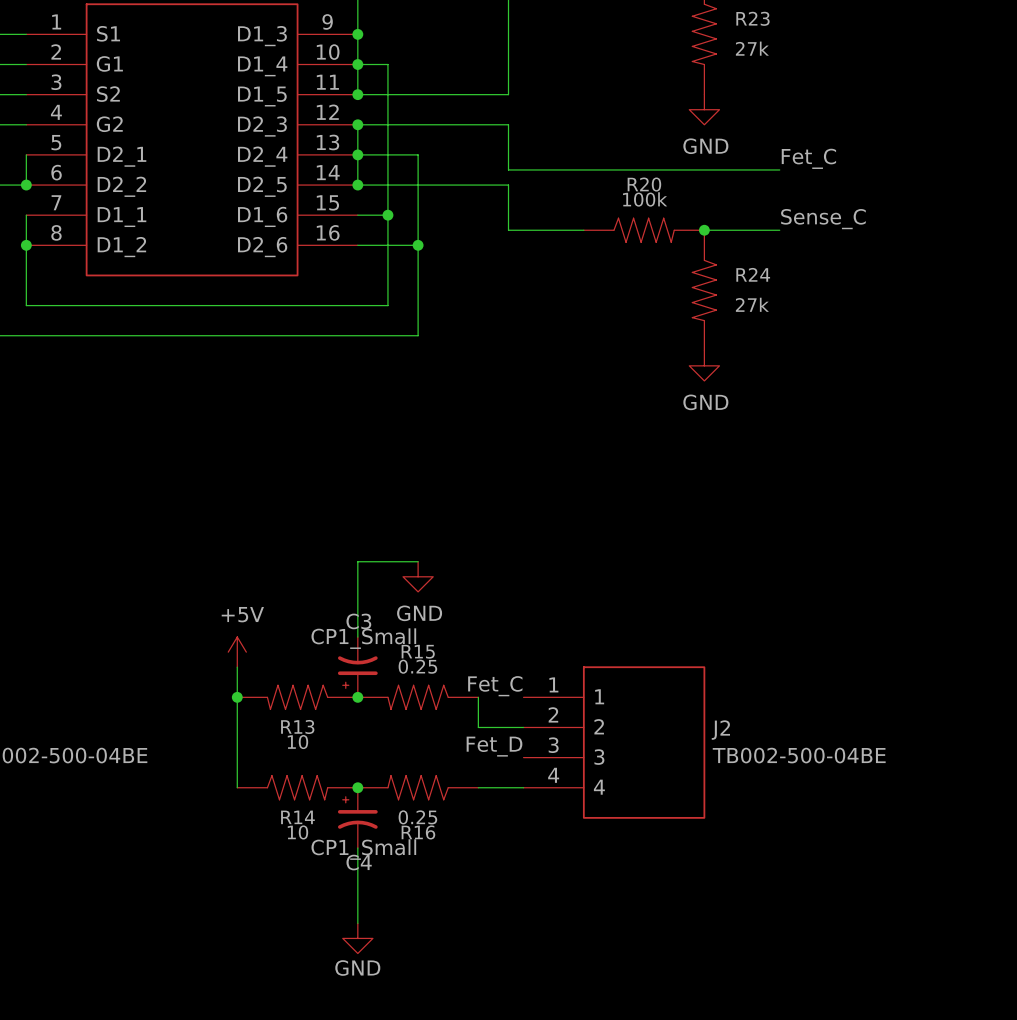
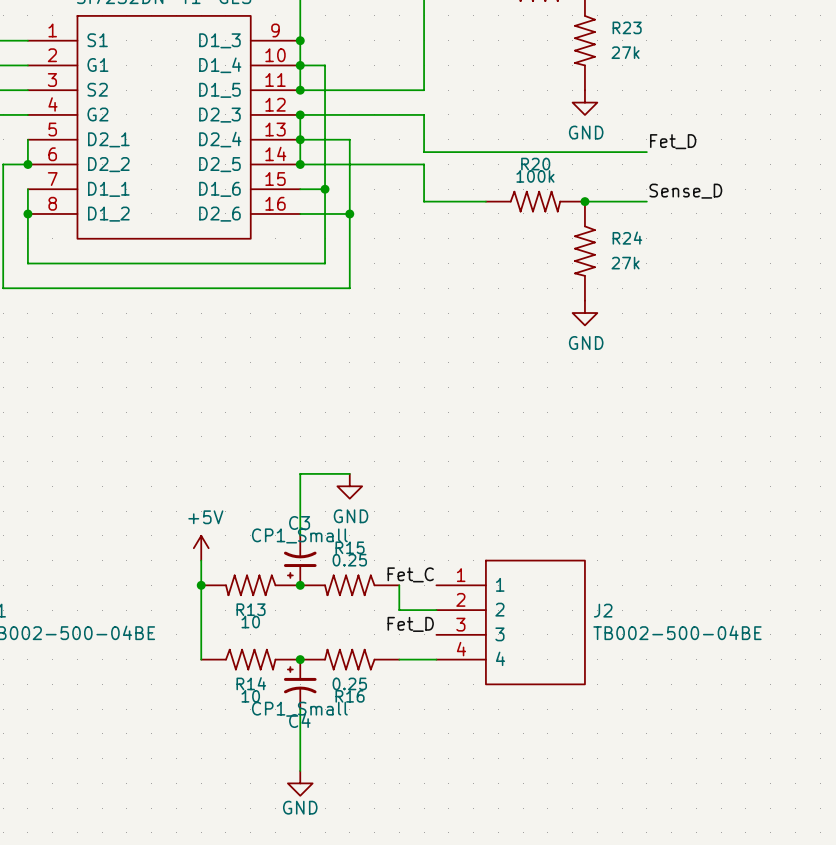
label: Fet_C (808, 158) -> Fet_D (673, 141)
label: Sense_C (823, 219) -> Sense_D (685, 191)

